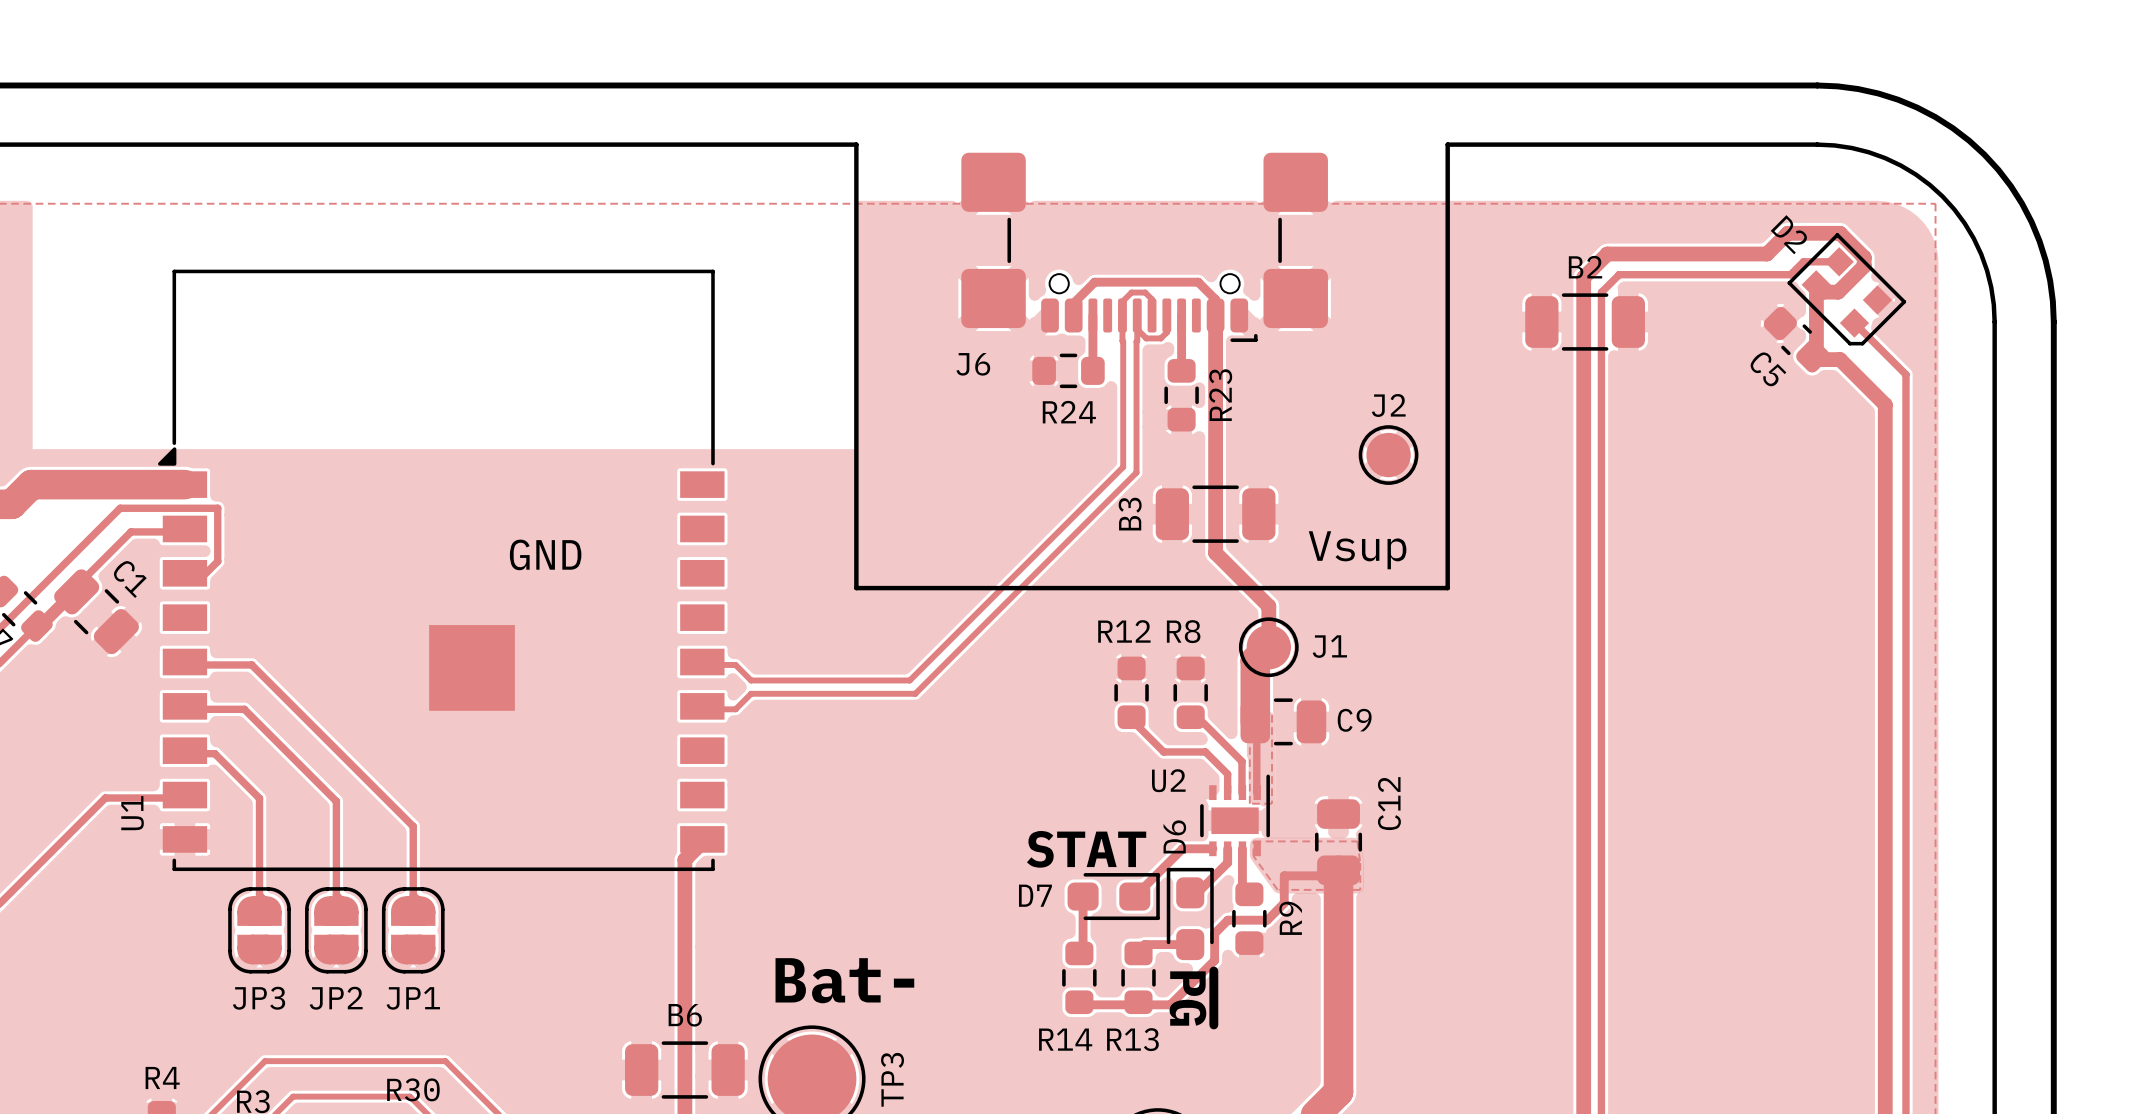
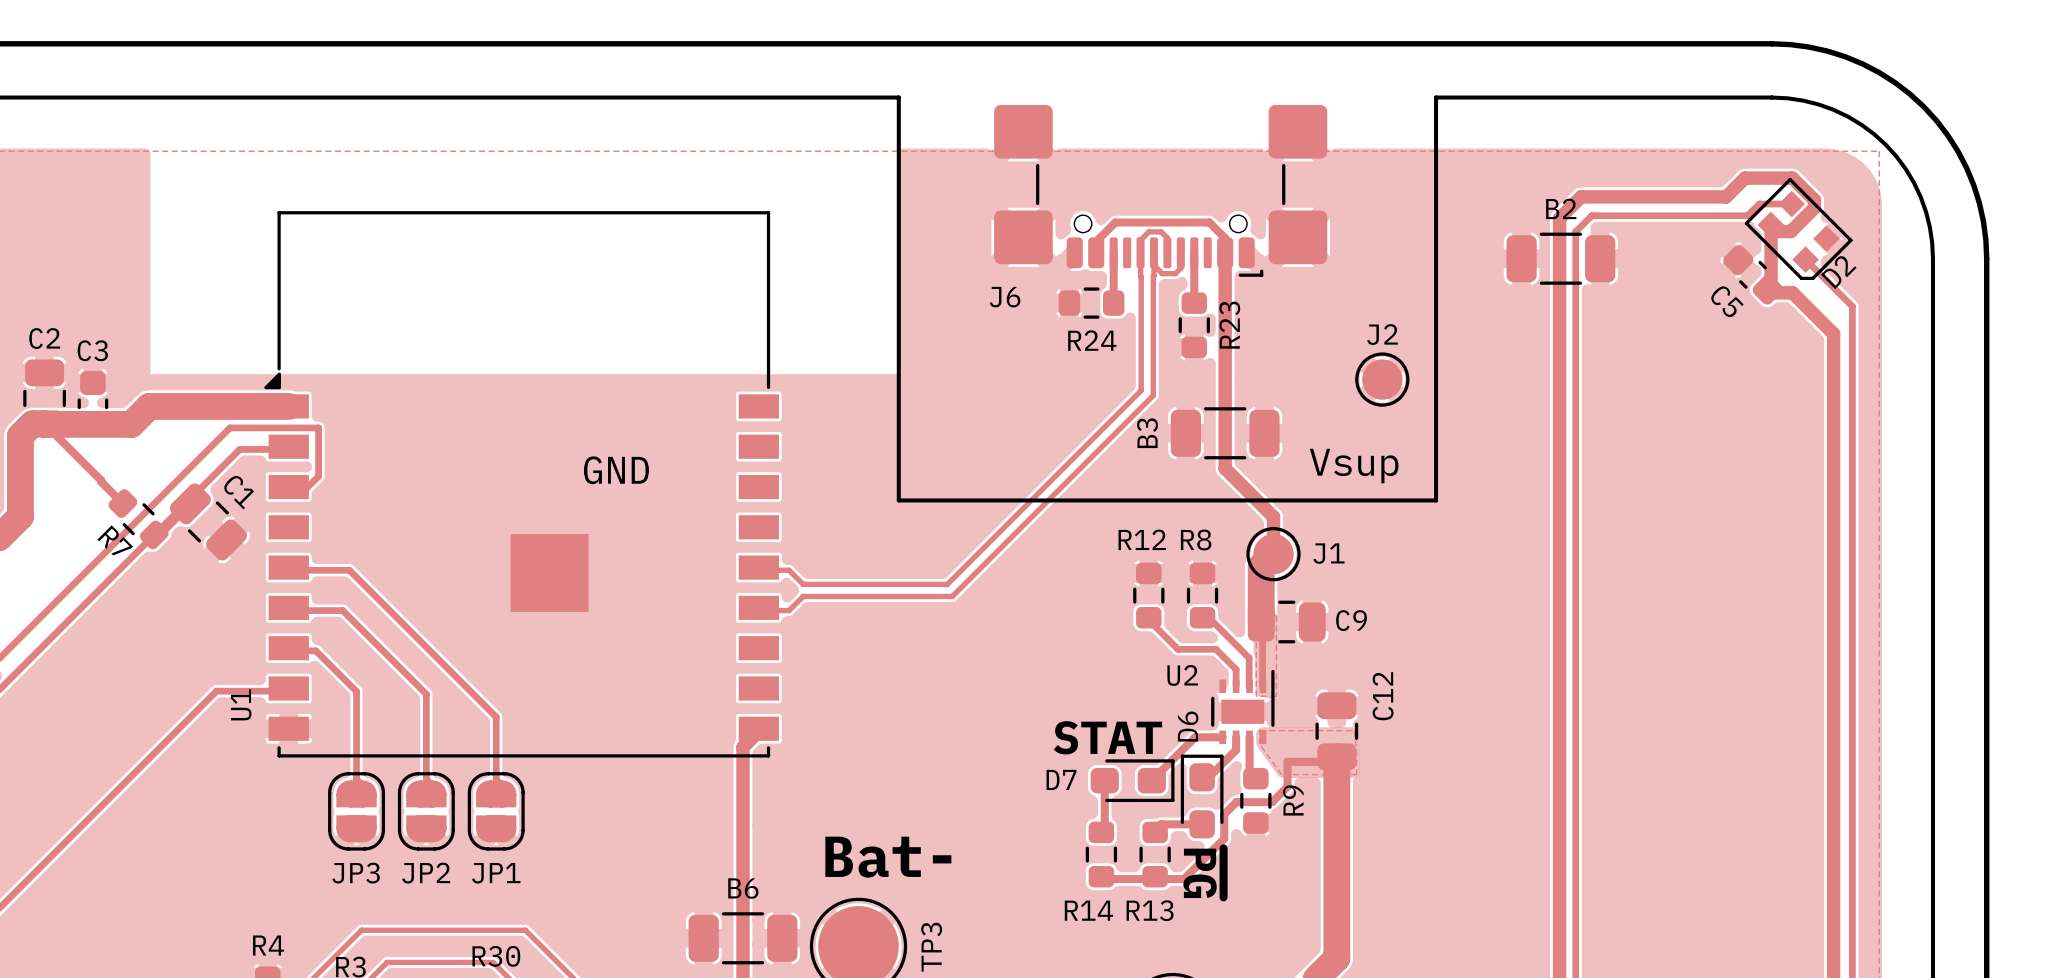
D2 name rotation: 0° (1788, 234) -> 90° counterclockwise (1838, 272)
D2 name position: D2 (1788, 234) -> D2 (1838, 272)

